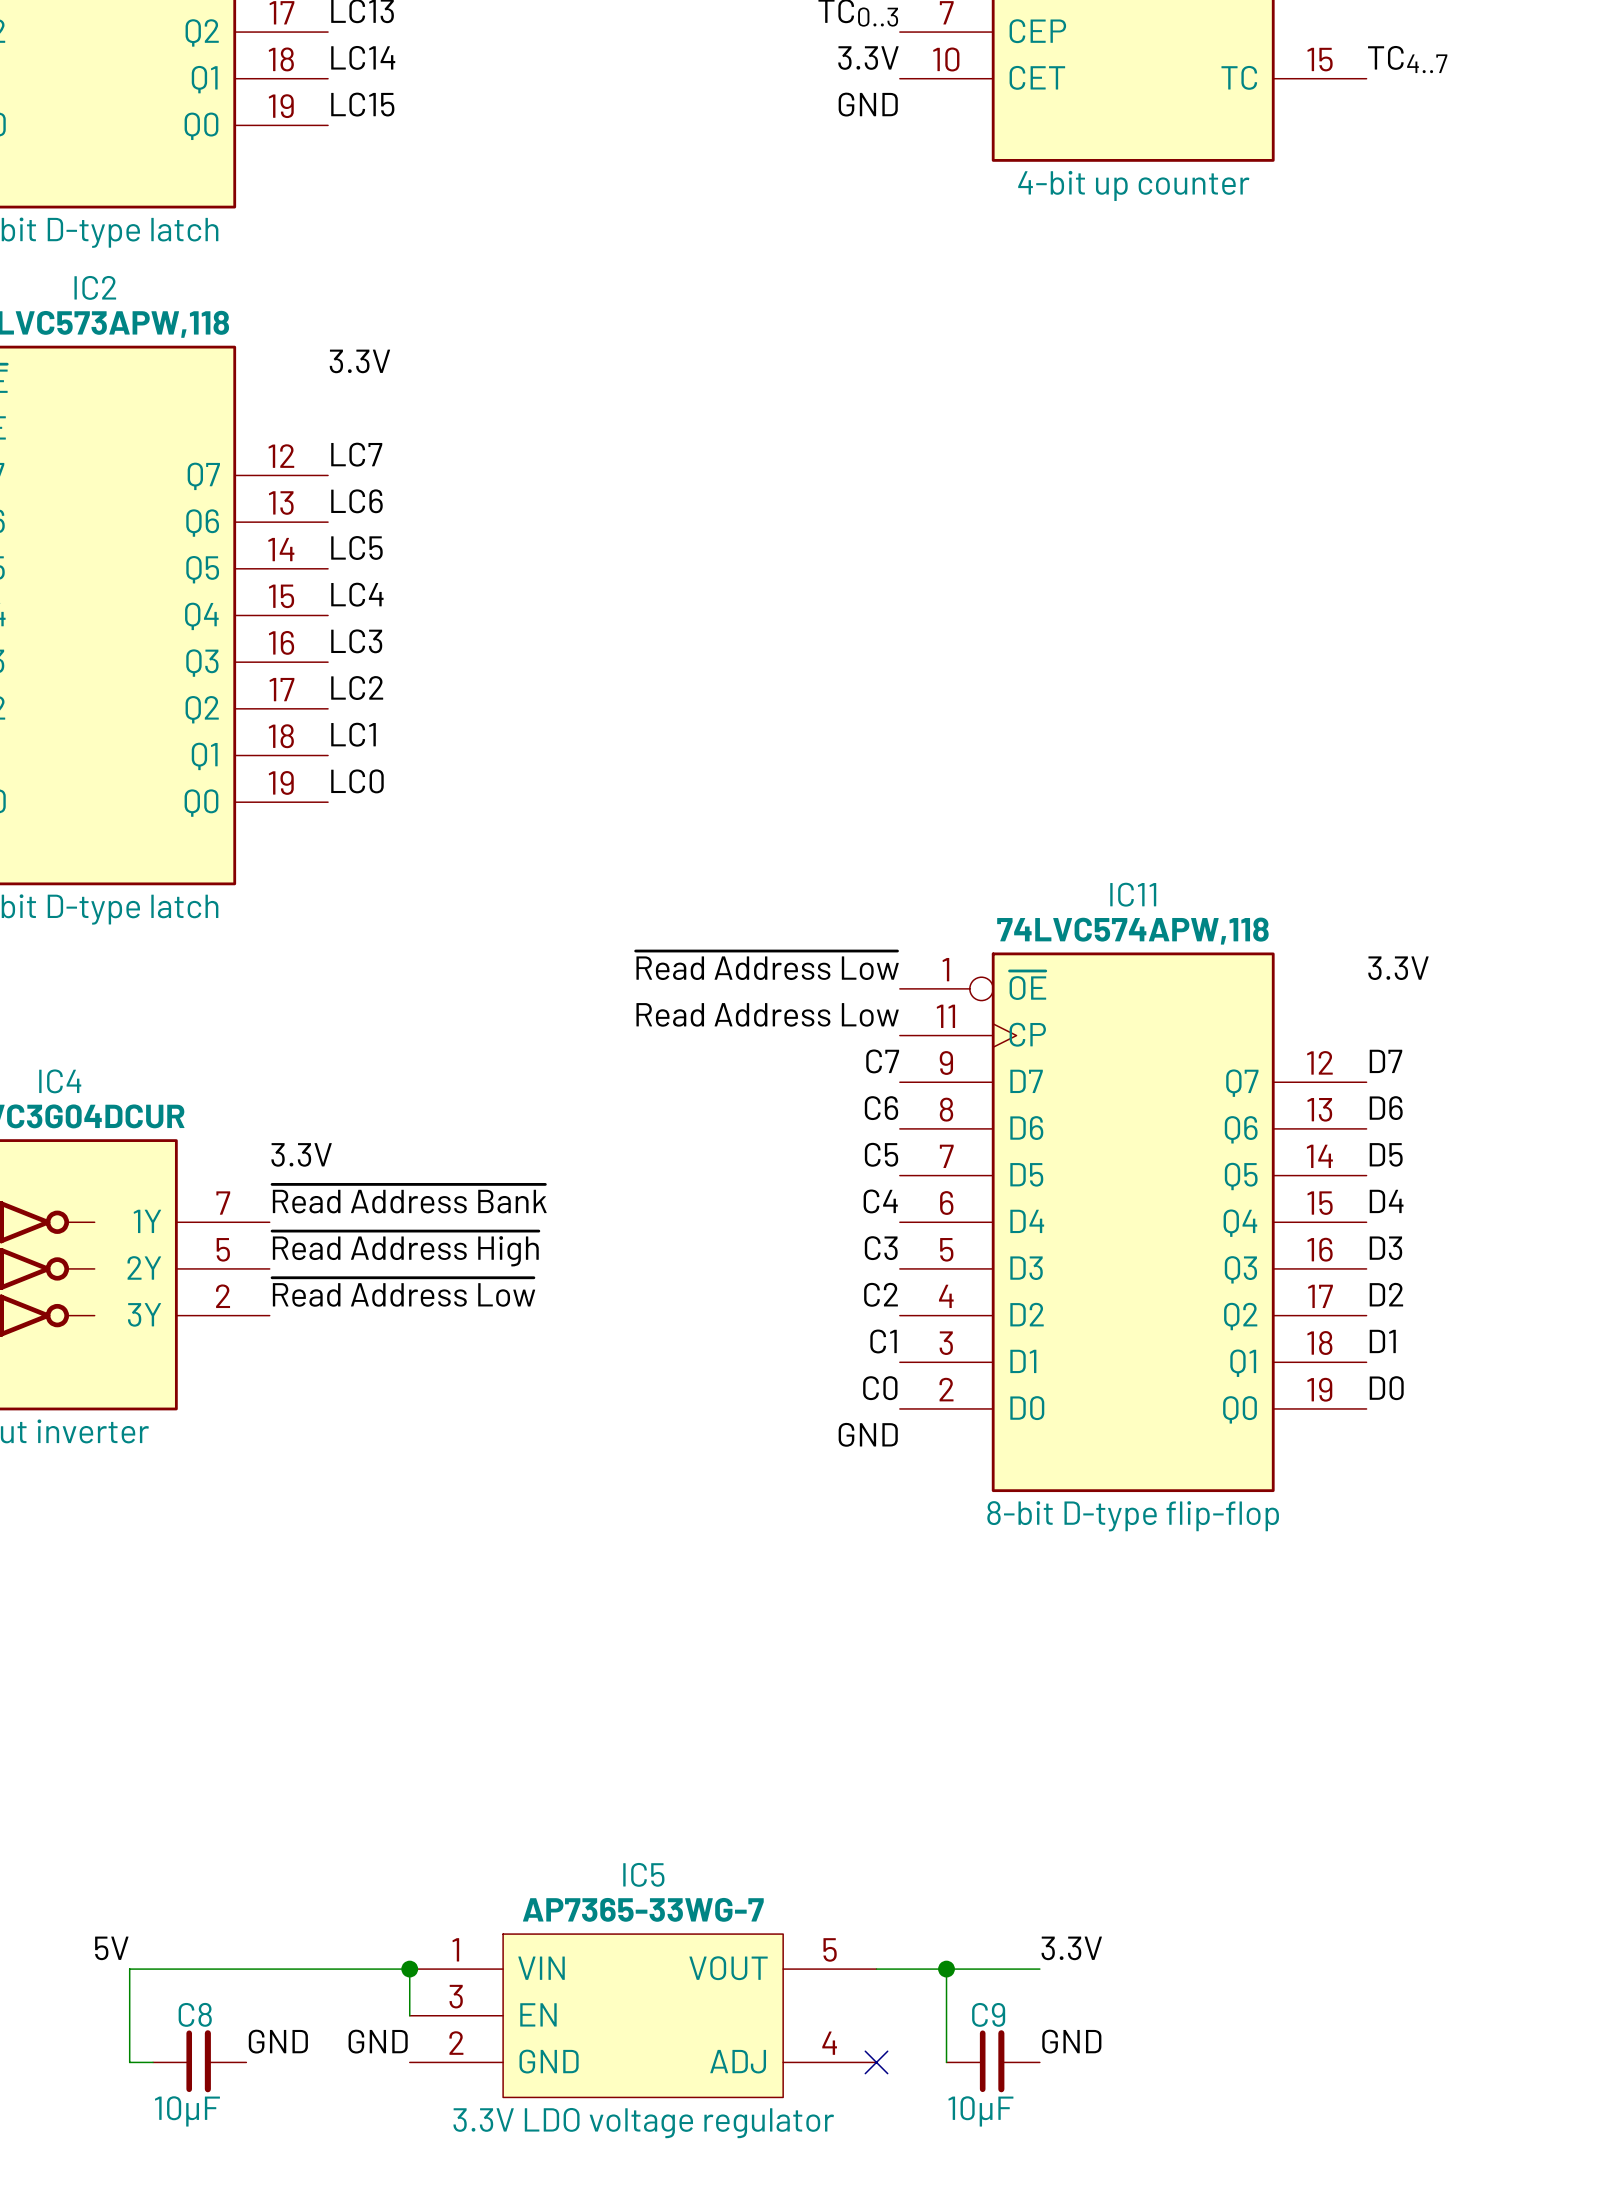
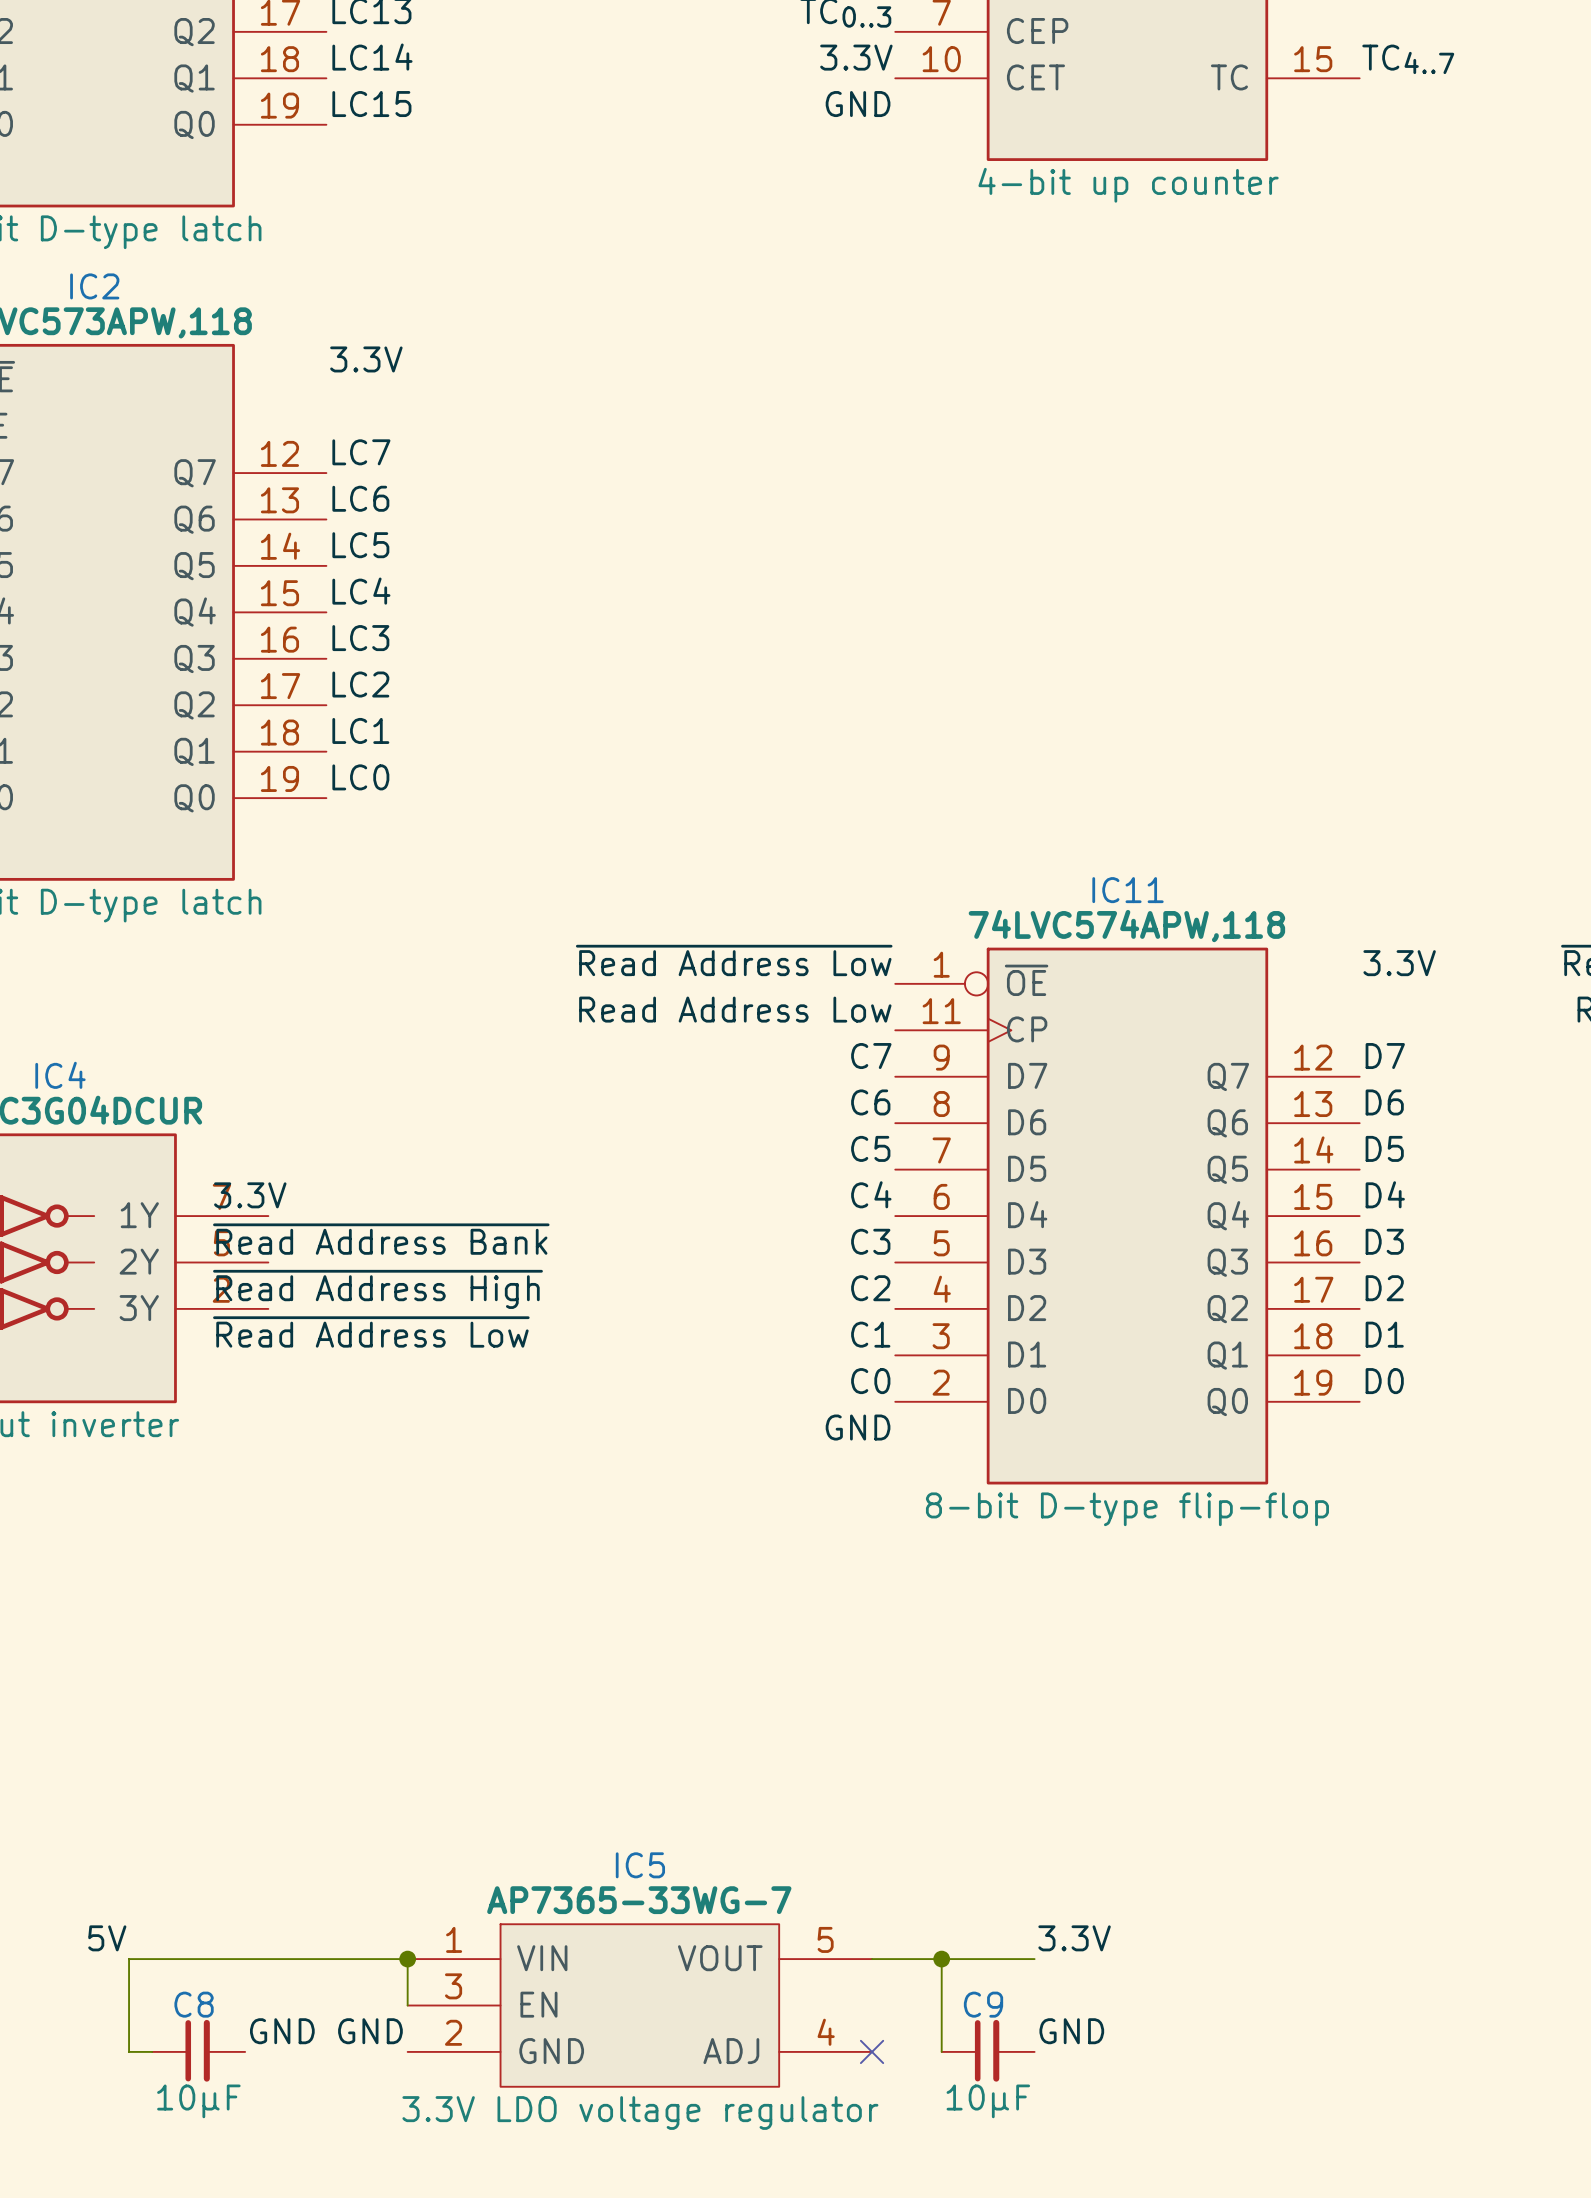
label position: 3.3V (301, 1154) -> 3.3V (250, 1195)
label position: ~{Read Address Bank} (409, 1198) -> ~{Read Address Bank} (381, 1239)
label position: ~{Read Address High} (405, 1248) -> ~{Read Address High} (377, 1289)
label position: ~{Read Address Low} (403, 1292) -> ~{Read Address Low} (371, 1331)

